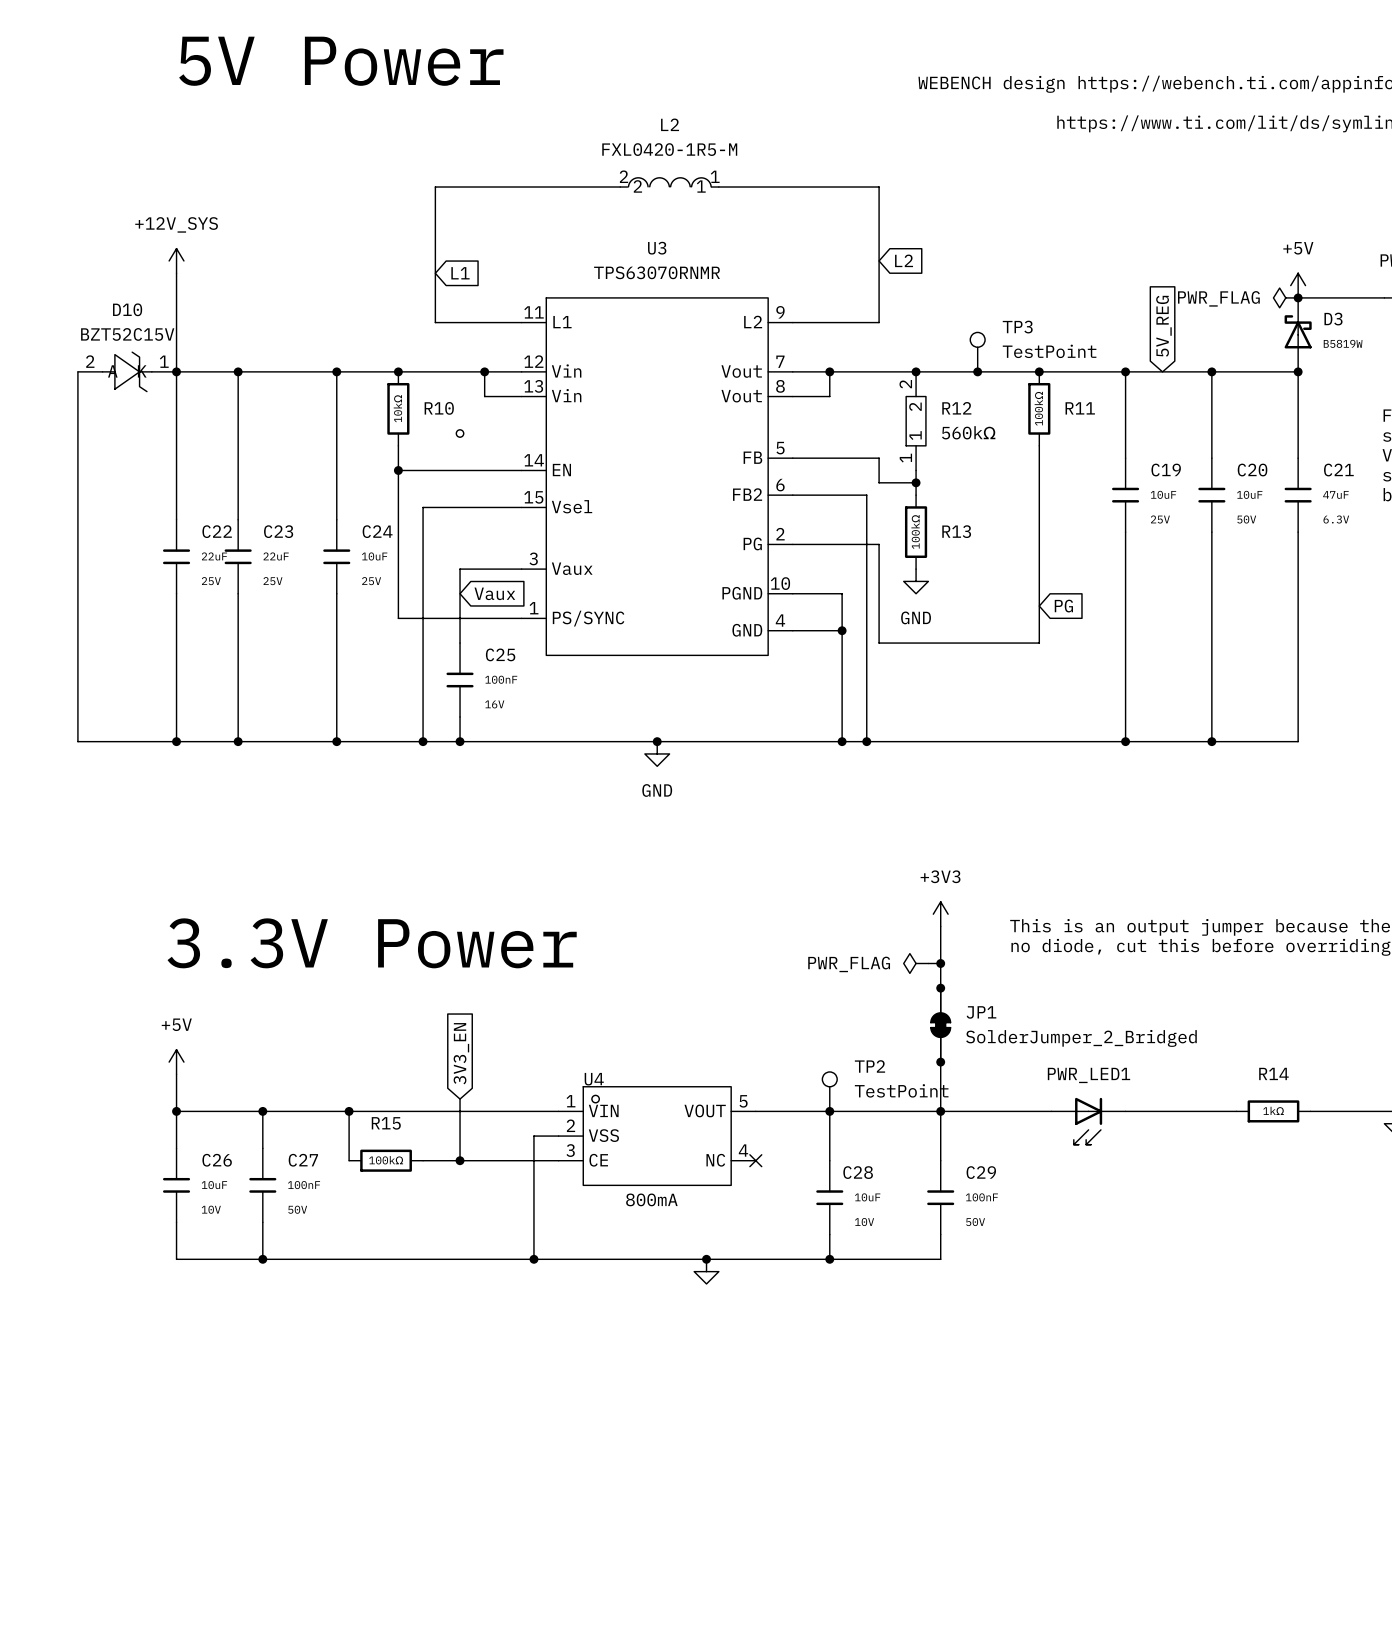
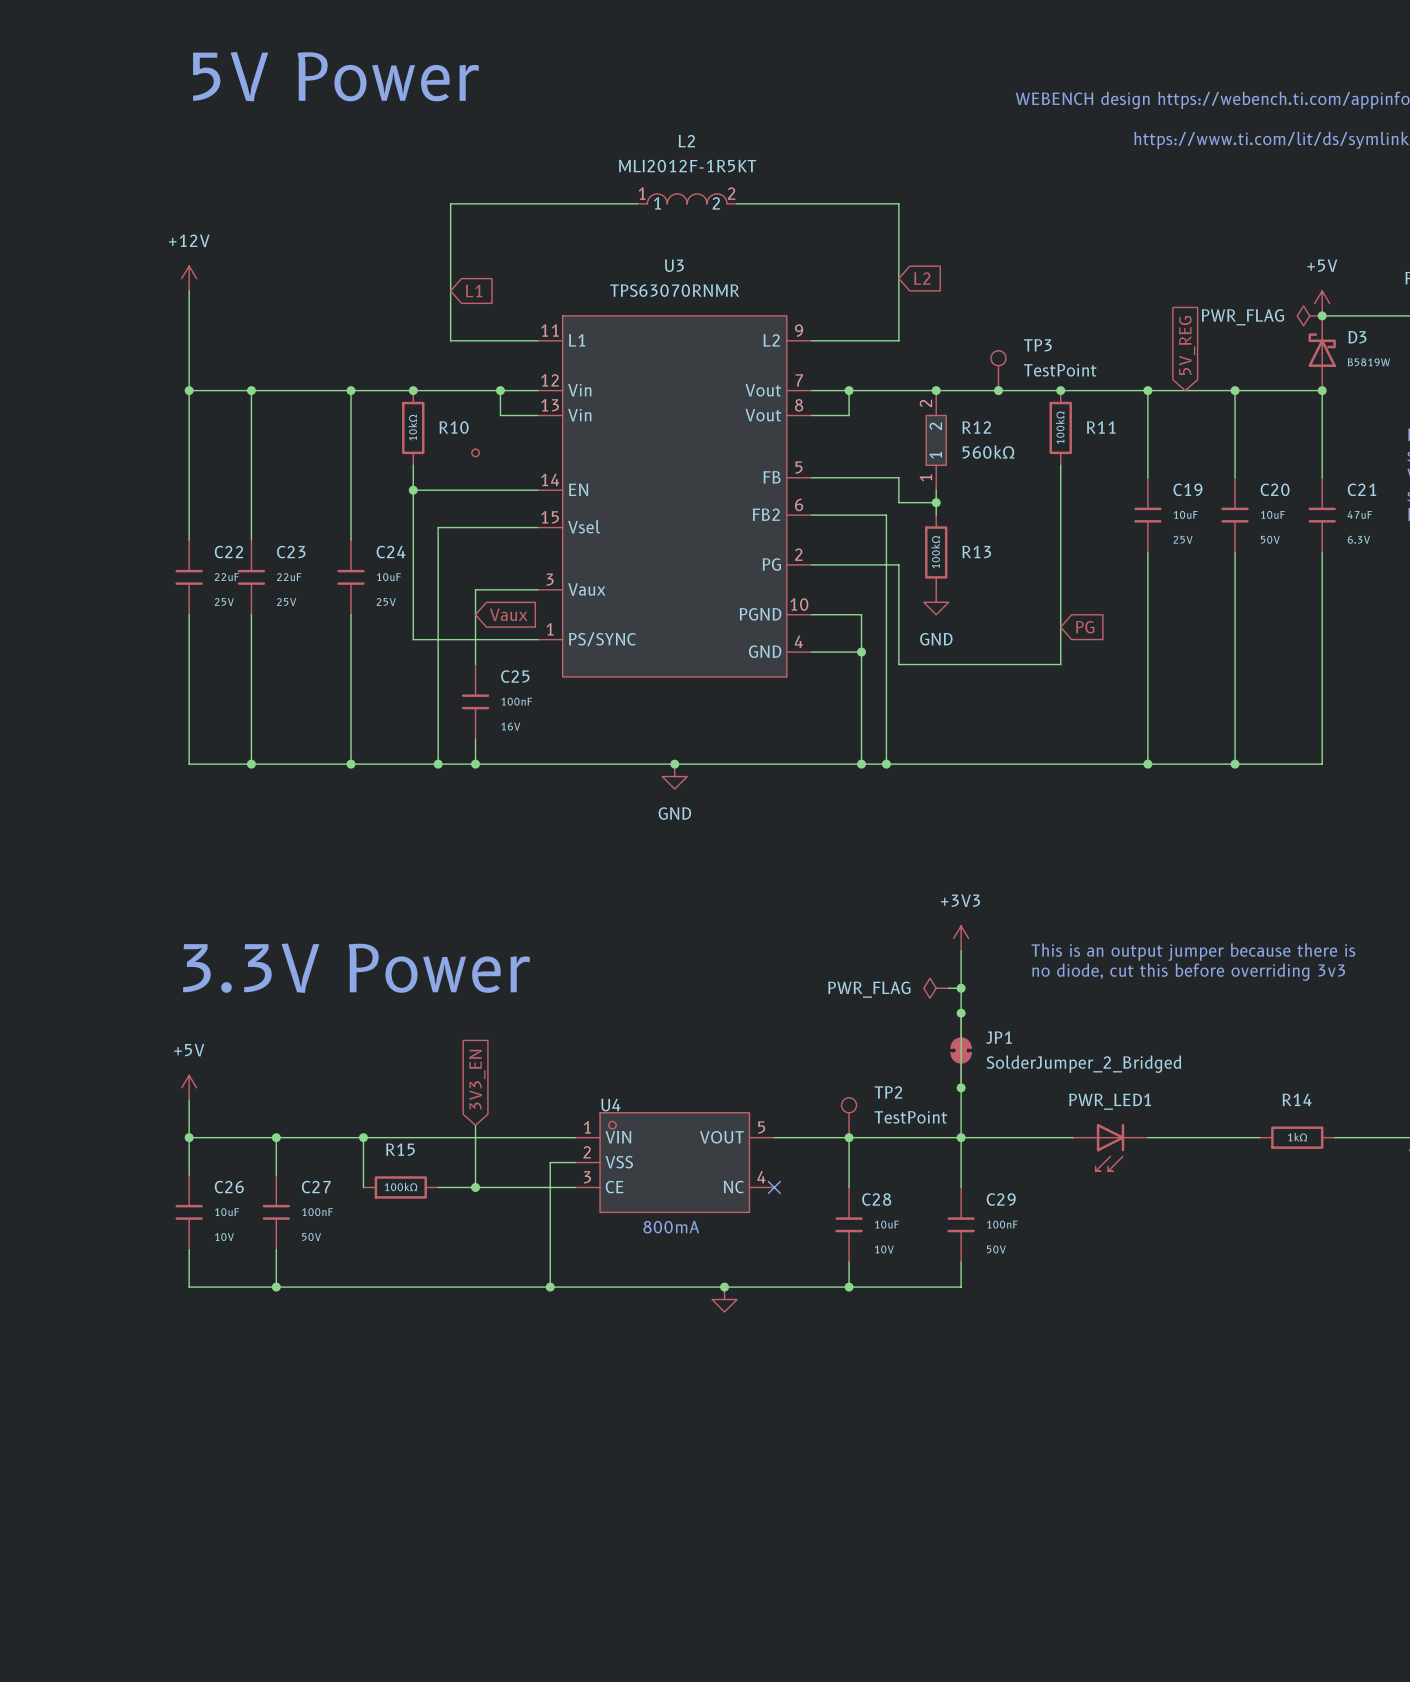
L2 value: FXL0420-1R5-M (669, 149) -> MLI2012F-1R5KT (687, 166)
L2 symbol: [620, 177, 719, 188] -> [637, 193, 738, 204]
power symbol: +12V_SYS (176, 260) -> +12V (189, 278)
wire: (77, 371) (77, 741) (176, 741) -> none
D10: BZT52C15V (127, 371) -> none
junction: (176, 741) -> none

